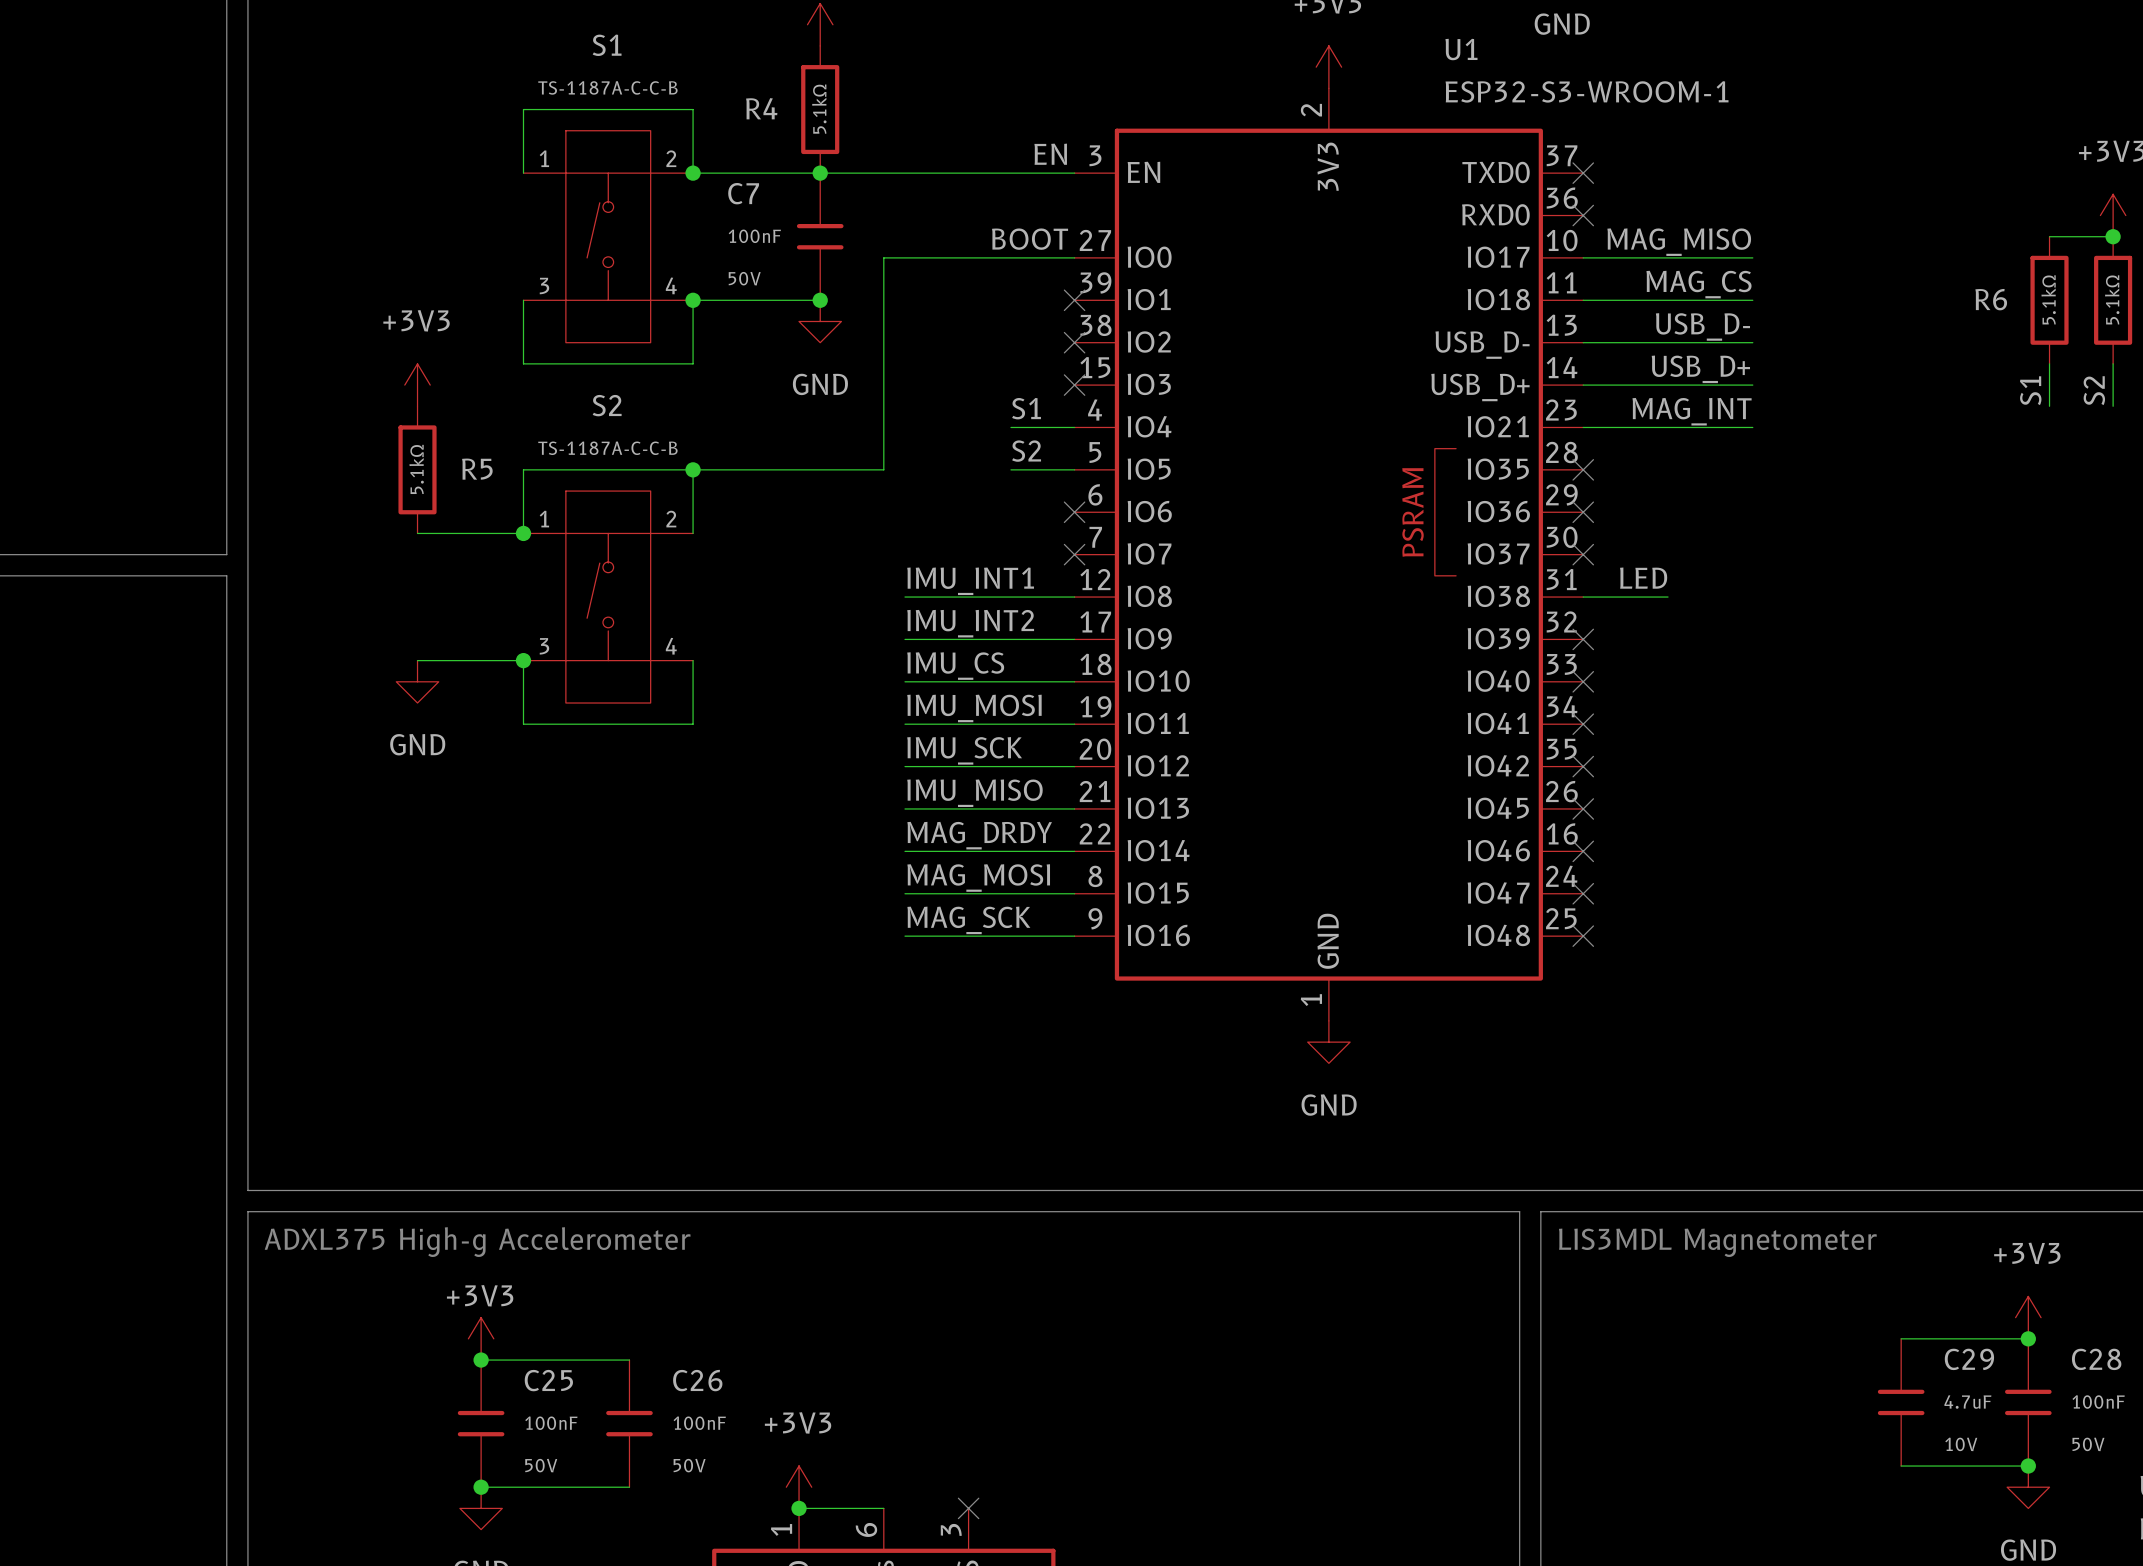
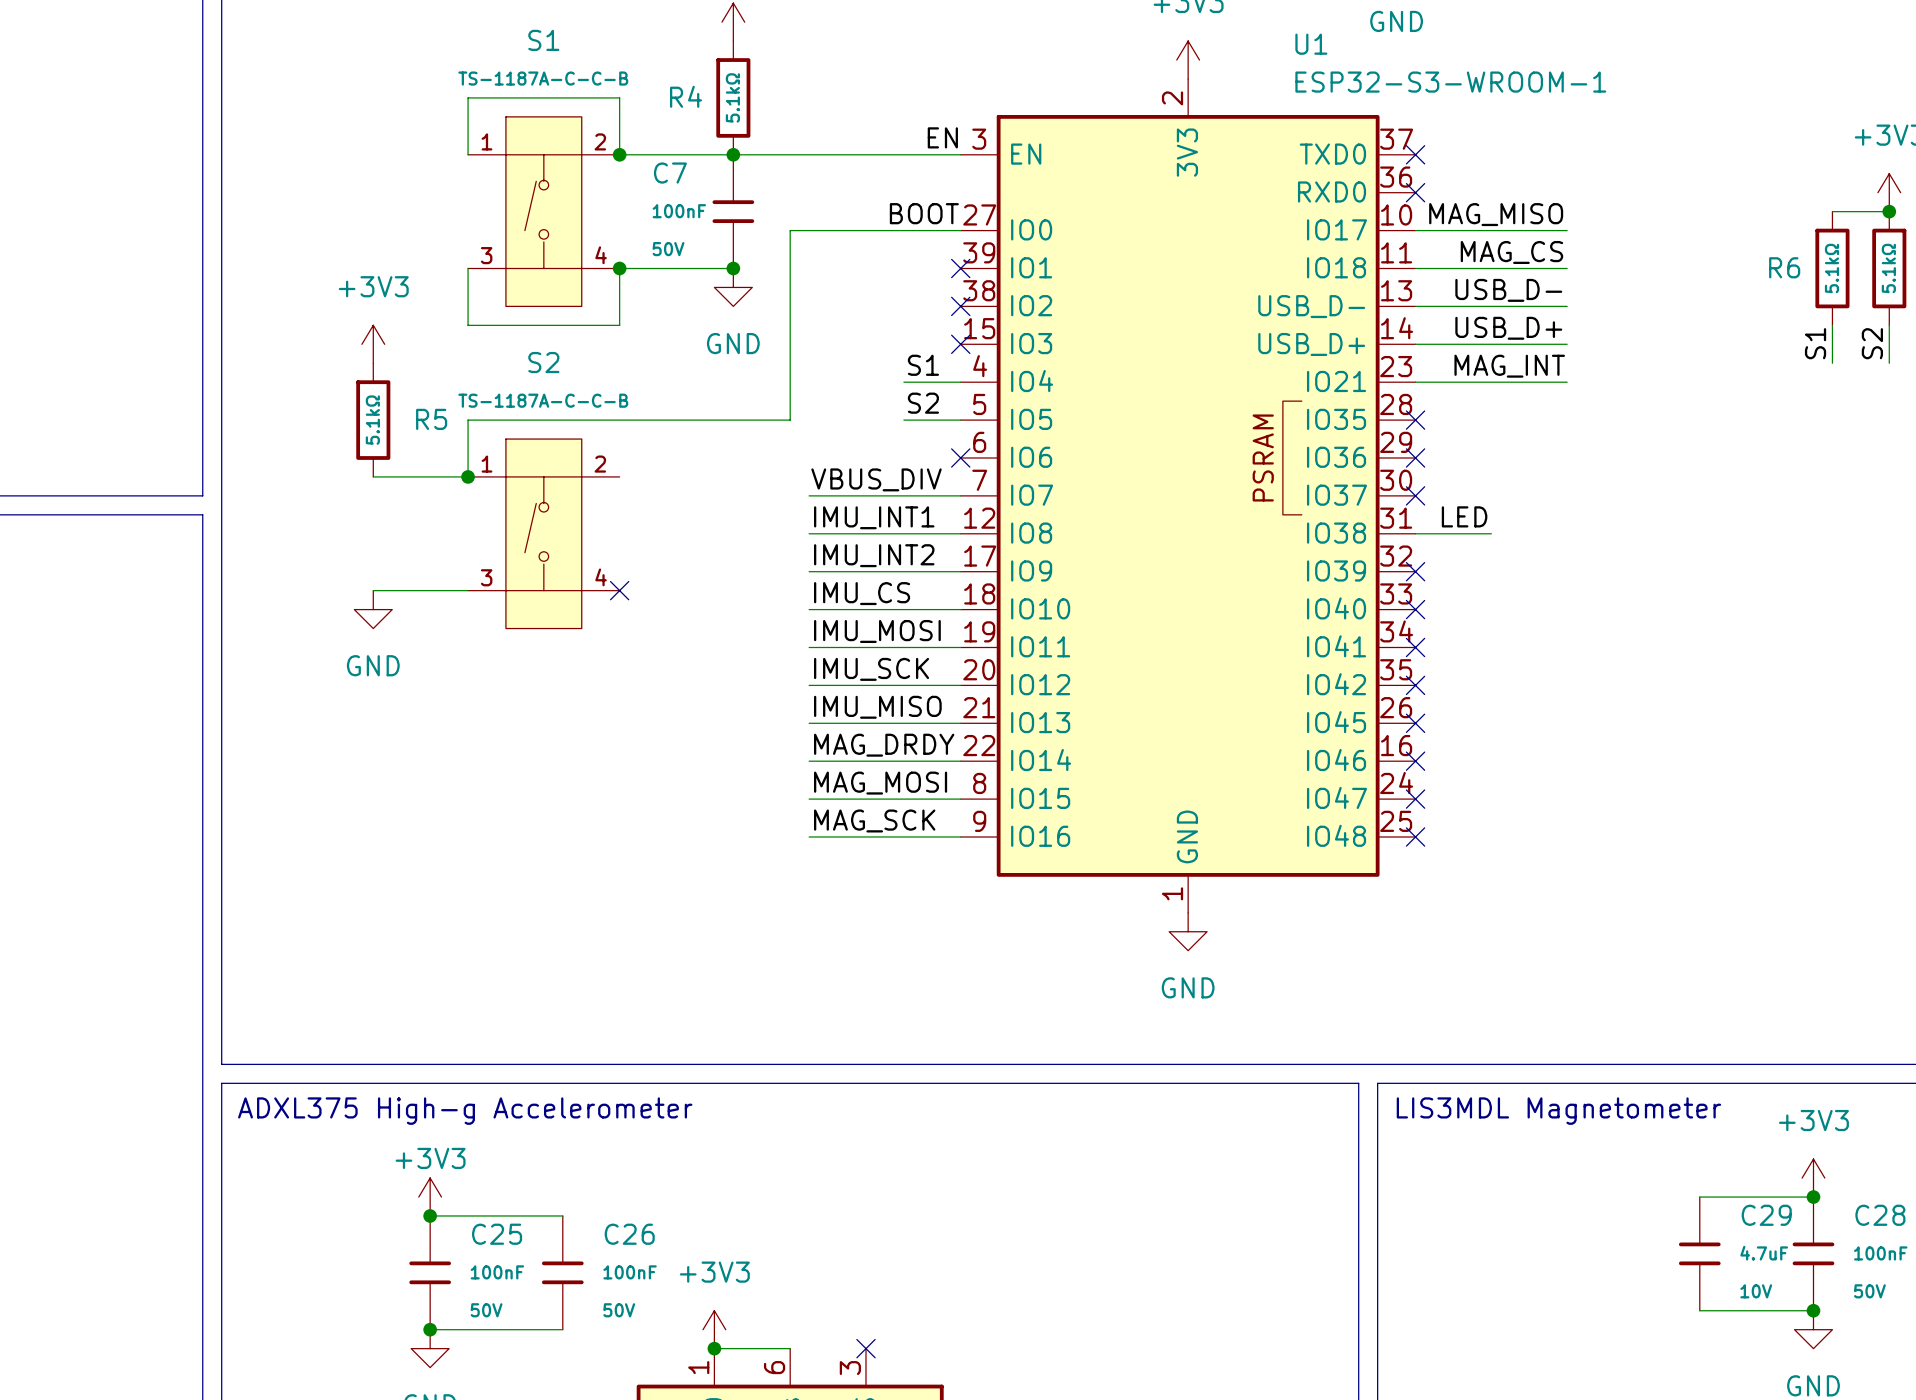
wire: (693, 469) (693, 533) -> none
junction: (693, 469) -> none
label: none -> VBUS_DIV (876, 479)
wire: none -> (809, 495) (960, 495)
no-connect mark: (1074, 554) -> none
wire: (523, 660) (523, 724) (693, 724) (693, 660) -> none
junction: (523, 660) -> none
no-connect mark: none -> (619, 590)

